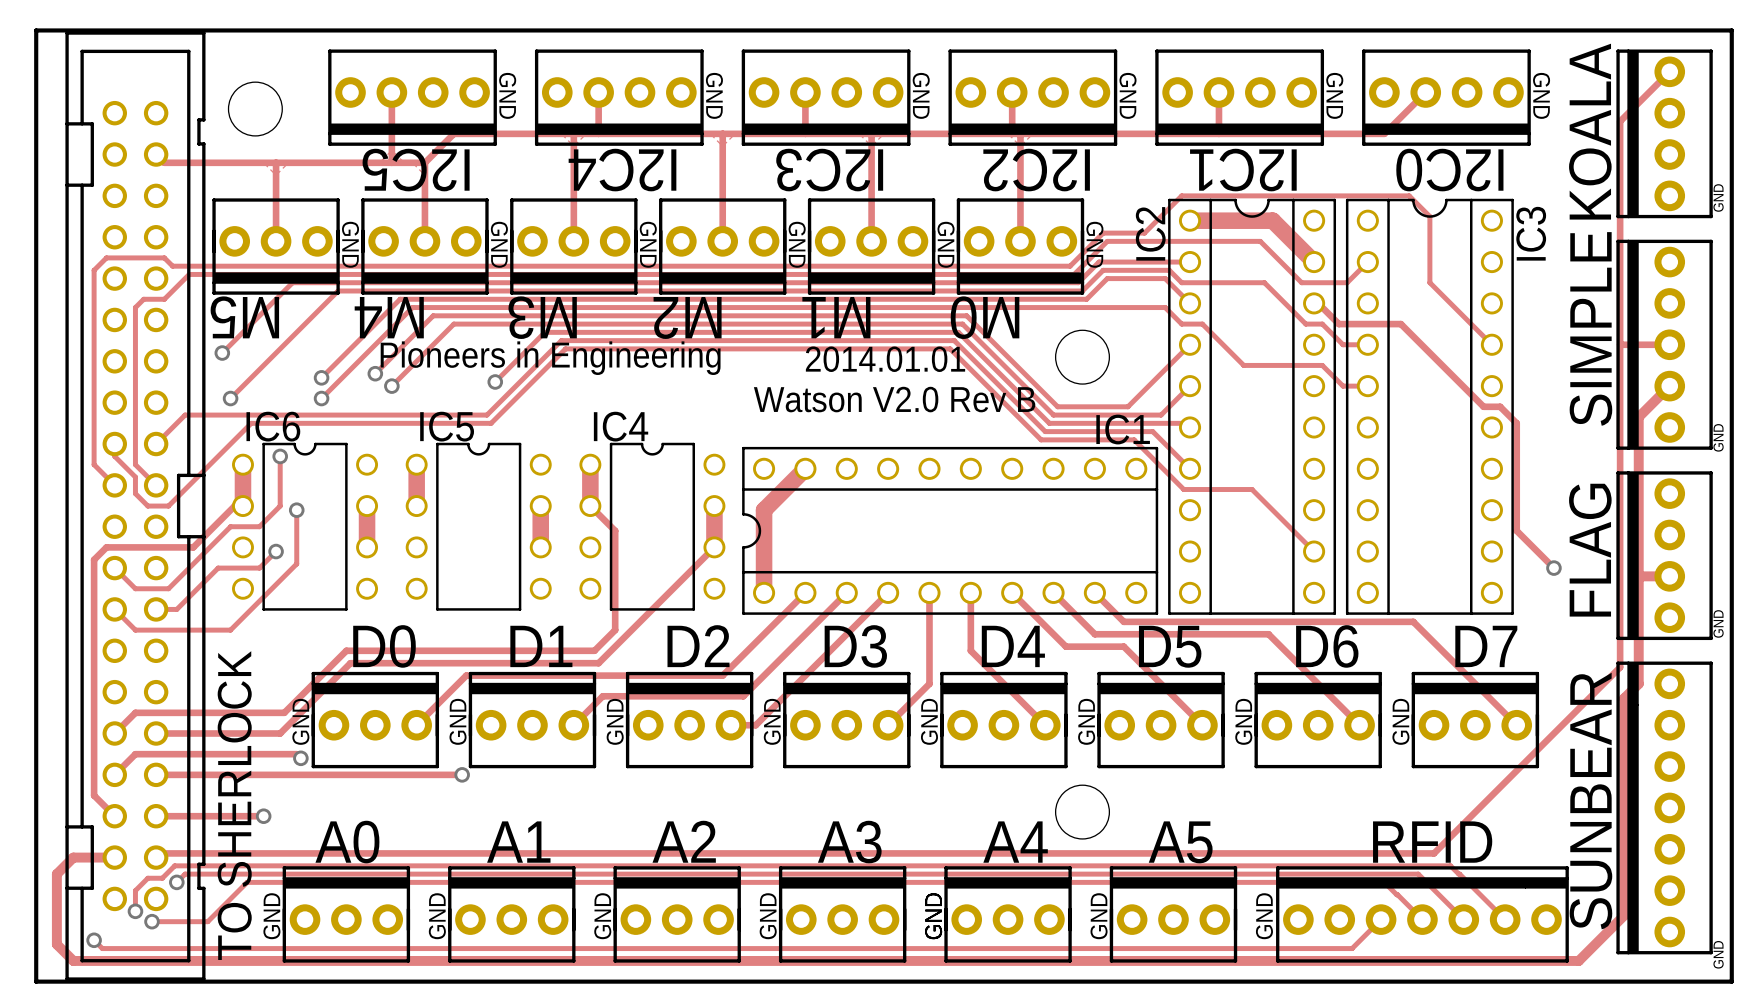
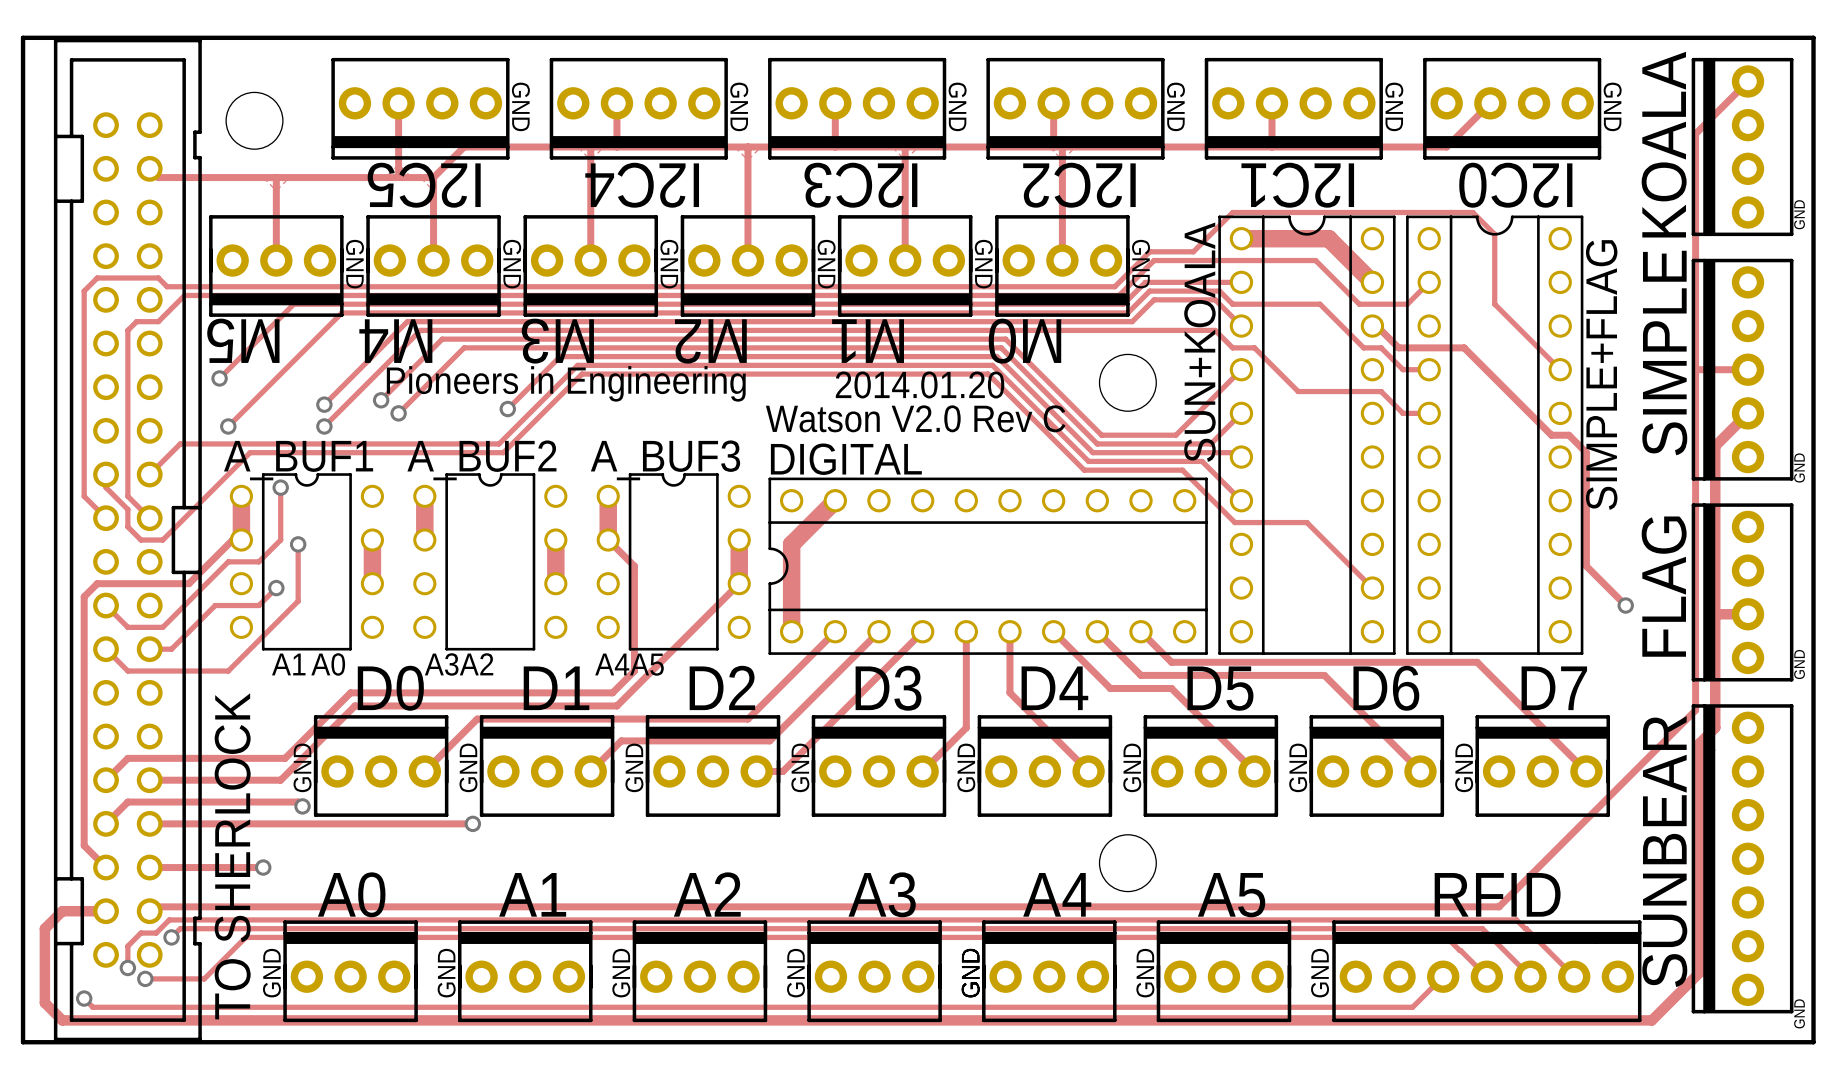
IC2 name: IC2 (1150, 233) -> SUN+KOALA (1199, 342)
IC3 name: IC3 (1531, 233) -> SIMPLE+FLAG (1601, 374)
text: 2014.01.01 (885, 359) -> 2014.01.20 (920, 384)
text: Watson V2.0 Rev B (894, 399) -> Watson V2.0 Rev C (915, 418)
IC6 name: IC6 (273, 426) -> A_BUF1 (298, 460)
IC5 name: IC5 (447, 426) -> A_BUF2 (481, 460)
IC4 name: IC4 (621, 426) -> A_BUF3 (665, 460)
IC1 name: IC1 (1123, 429) -> DIGITAL (846, 459)
text: none -> A1 (288, 664)
text: none -> A0 (328, 664)
text: none -> A3A2 (459, 664)
text: none -> A4A5 (629, 664)

